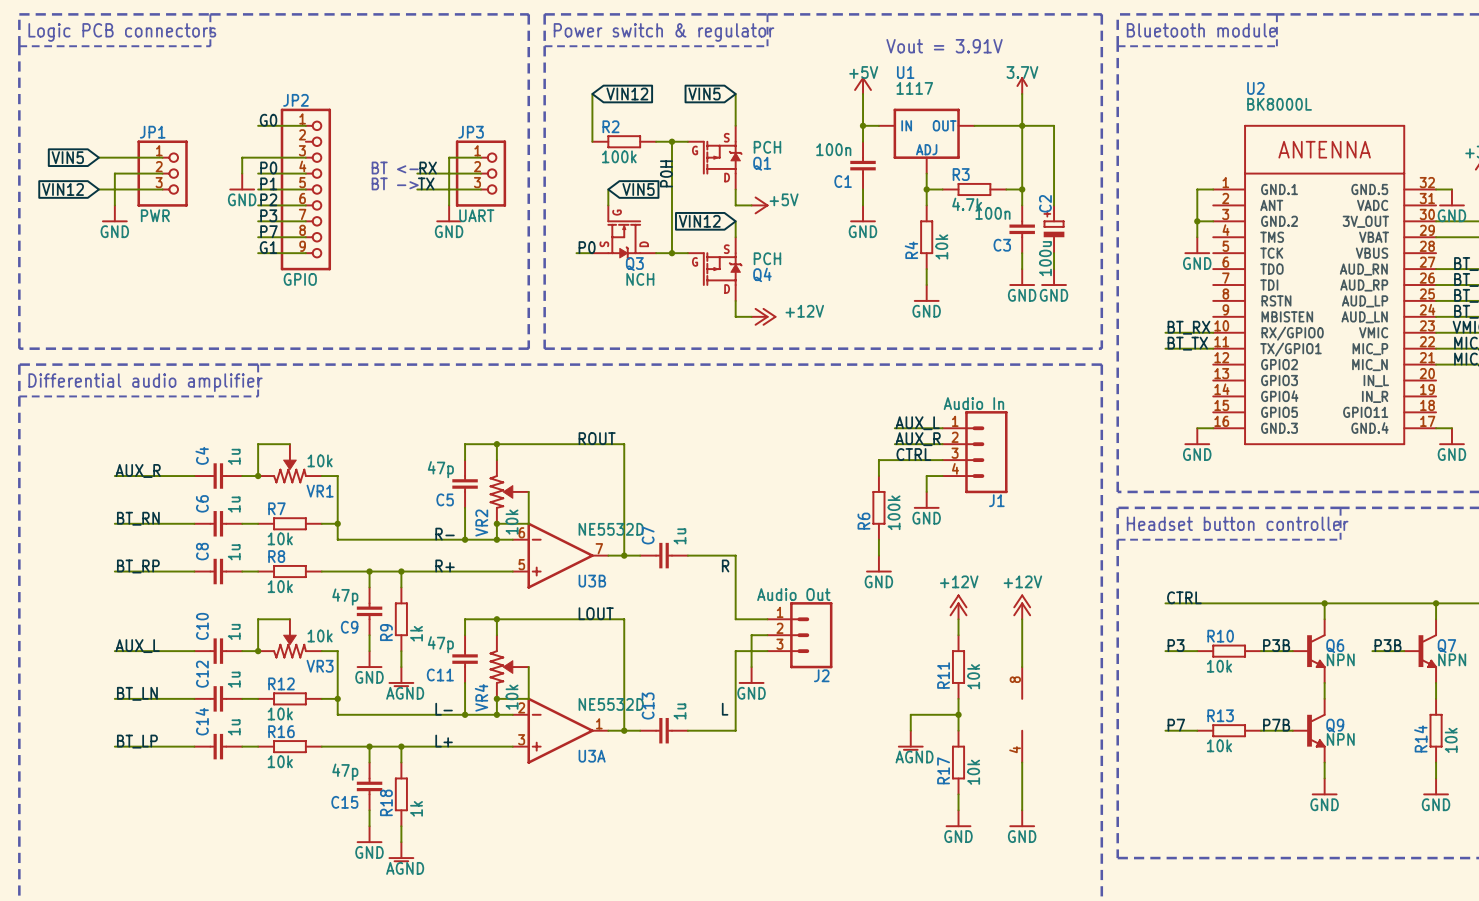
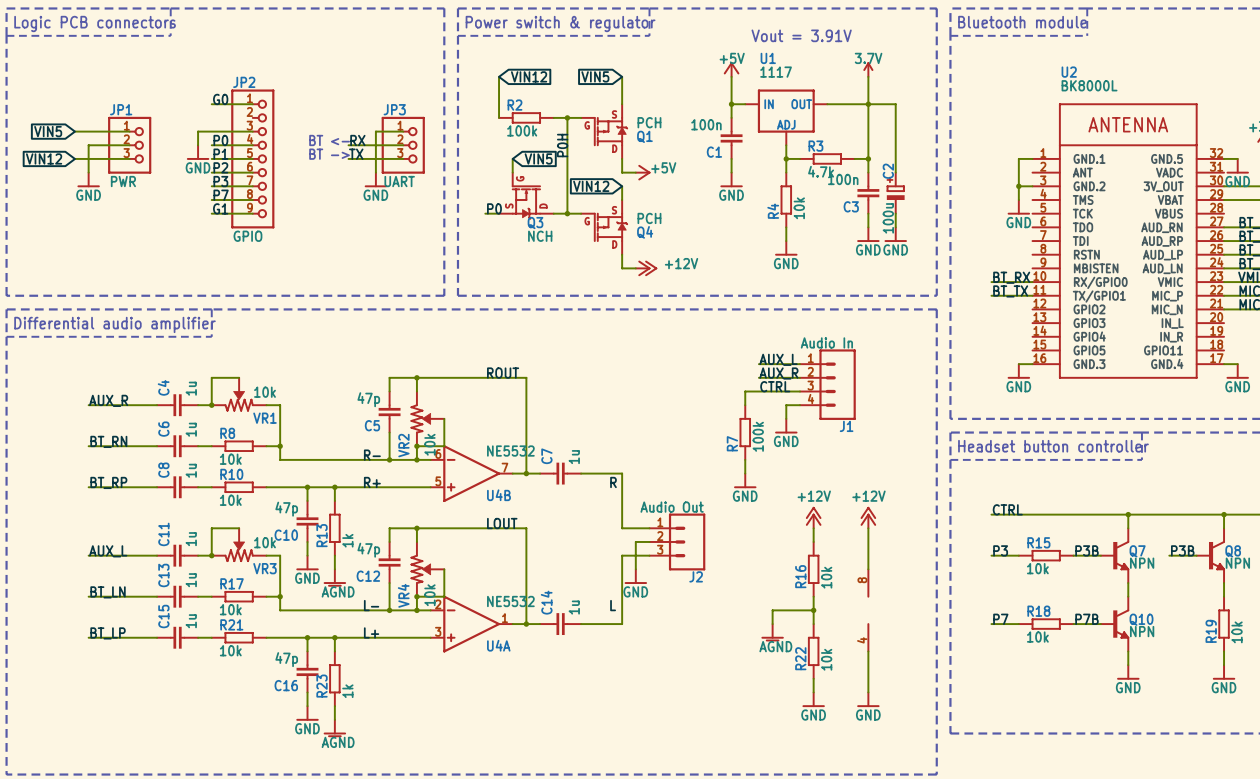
R7 name: R7 (276, 508) -> R8 (227, 433)
R6 name: R6 (863, 521) -> R7 (732, 443)
U3B value: NE5532D (611, 529) -> NE5532 (510, 451)
R8 name: R8 (276, 556) -> R10 (231, 474)
U3B name: U3B (592, 581) -> U4B (498, 495)
C10 name: C10 (202, 626) -> C11 (163, 534)
C9 name: C9 (349, 627) -> C10 (286, 535)
R9 name: R9 (386, 632) -> R13 (322, 535)
R10 name: R10 (1220, 636) -> R15 (1038, 542)
Q6 name: Q6 (1335, 646) -> Q7 (1137, 551)
Q7 name: Q7 (1446, 646) -> Q8 (1233, 551)
C12 name: C12 (202, 674) -> C13 (163, 575)
C11 name: C11 (440, 675) -> C12 (368, 576)
R11 name: R11 (943, 675) -> R16 (800, 576)
R12 name: R12 (281, 683) -> R17 (232, 583)
U3A value: NE5532D (611, 704) -> NE5532 (510, 601)
C13 name: C13 (648, 706) -> C14 (546, 602)
R13 name: R13 (1220, 715) -> R18 (1038, 611)
C14 name: C14 (202, 721) -> C15 (163, 616)
Q9 name: Q9 (1335, 725) -> Q10 (1141, 619)
R16 name: R16 (281, 731) -> R21 (231, 624)
R14 name: R14 (1420, 738) -> R19 (1211, 631)
U3A name: U3A (592, 756) -> U4A (498, 645)
R17 name: R17 (943, 770) -> R22 (800, 658)
C15 name: C15 (344, 802) -> C16 (286, 685)
R18 name: R18 (386, 802) -> R23 (322, 686)

